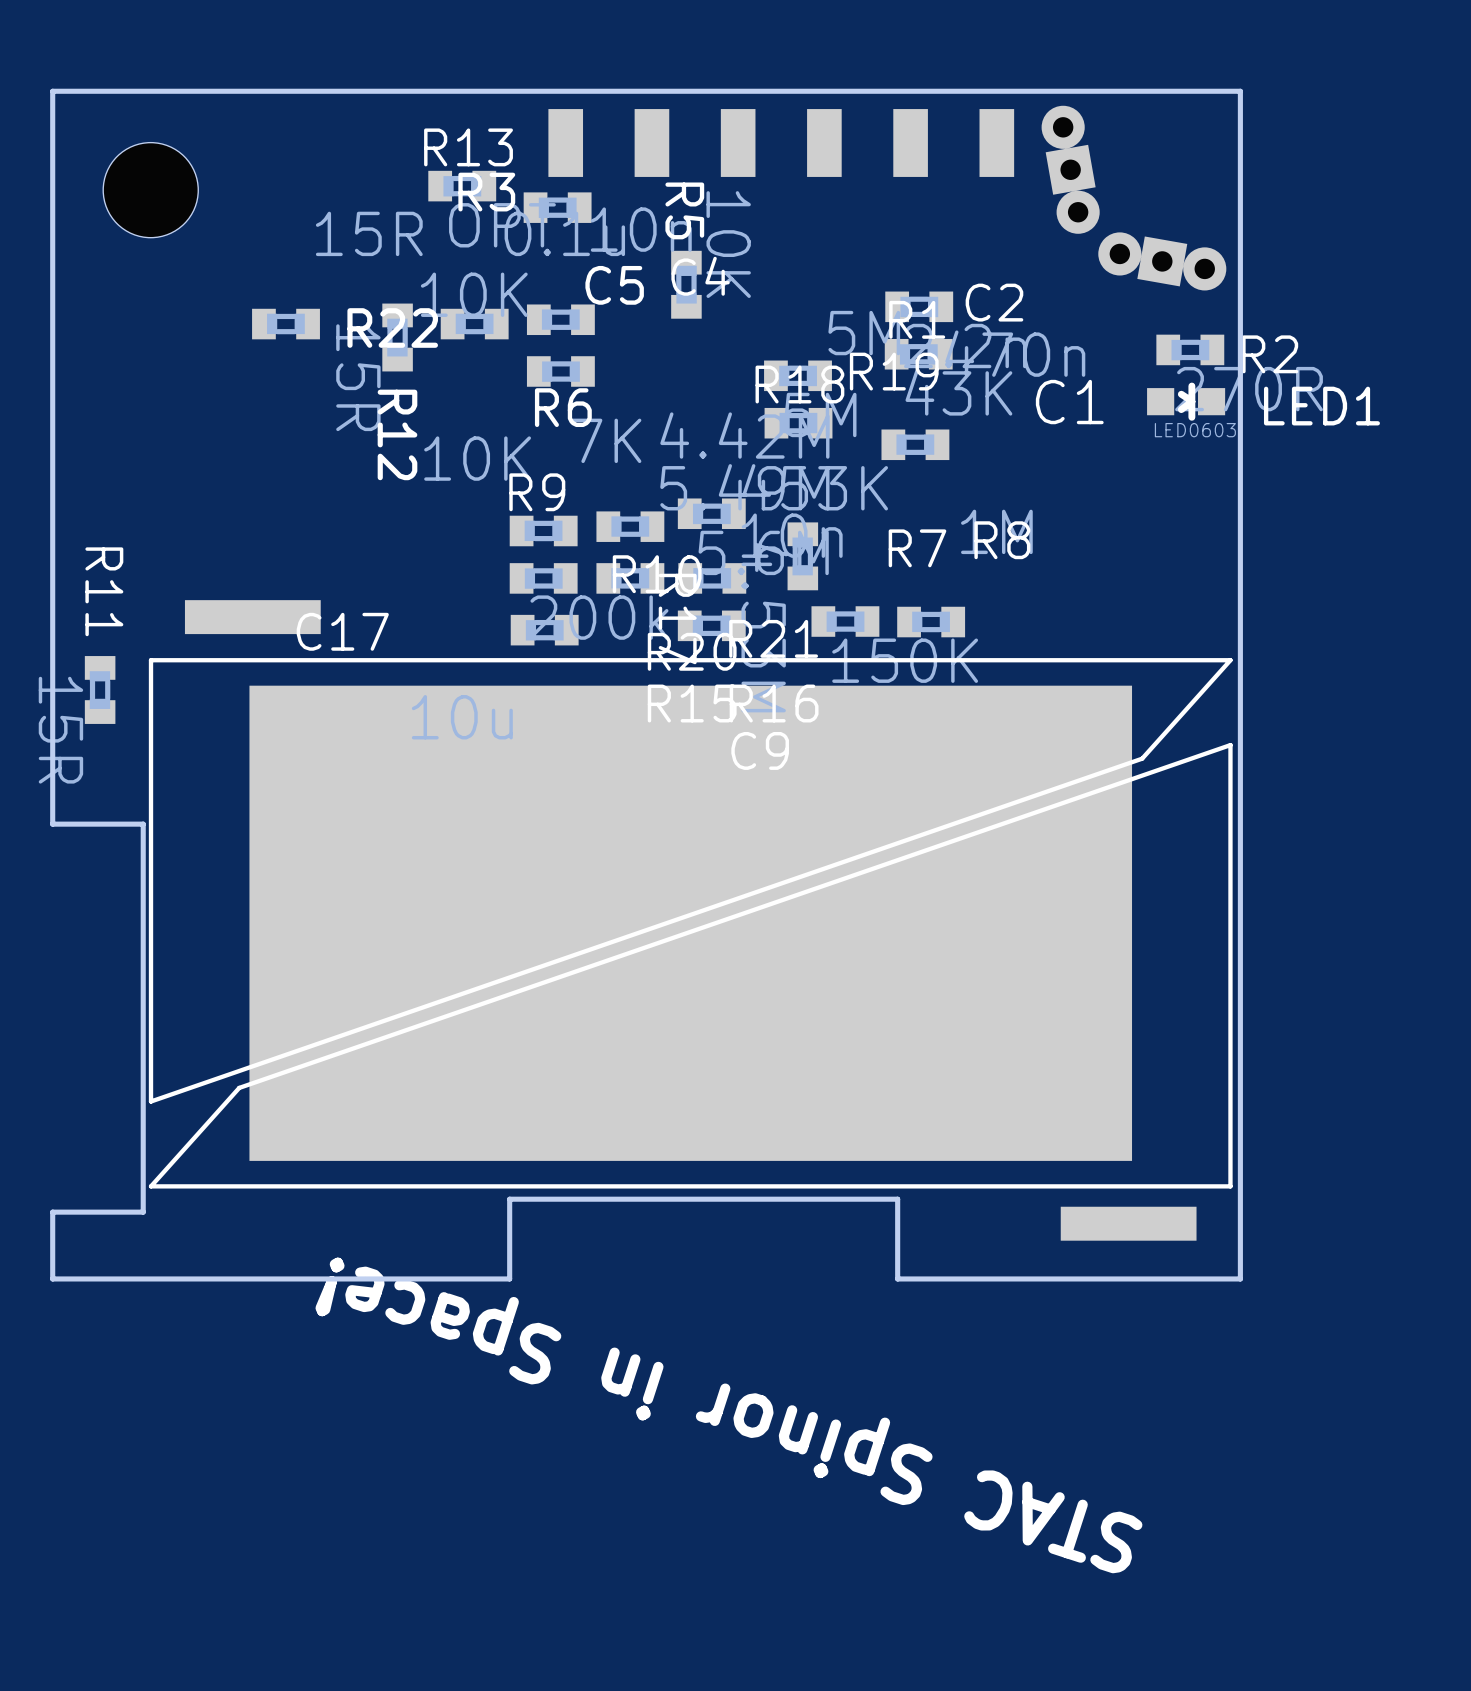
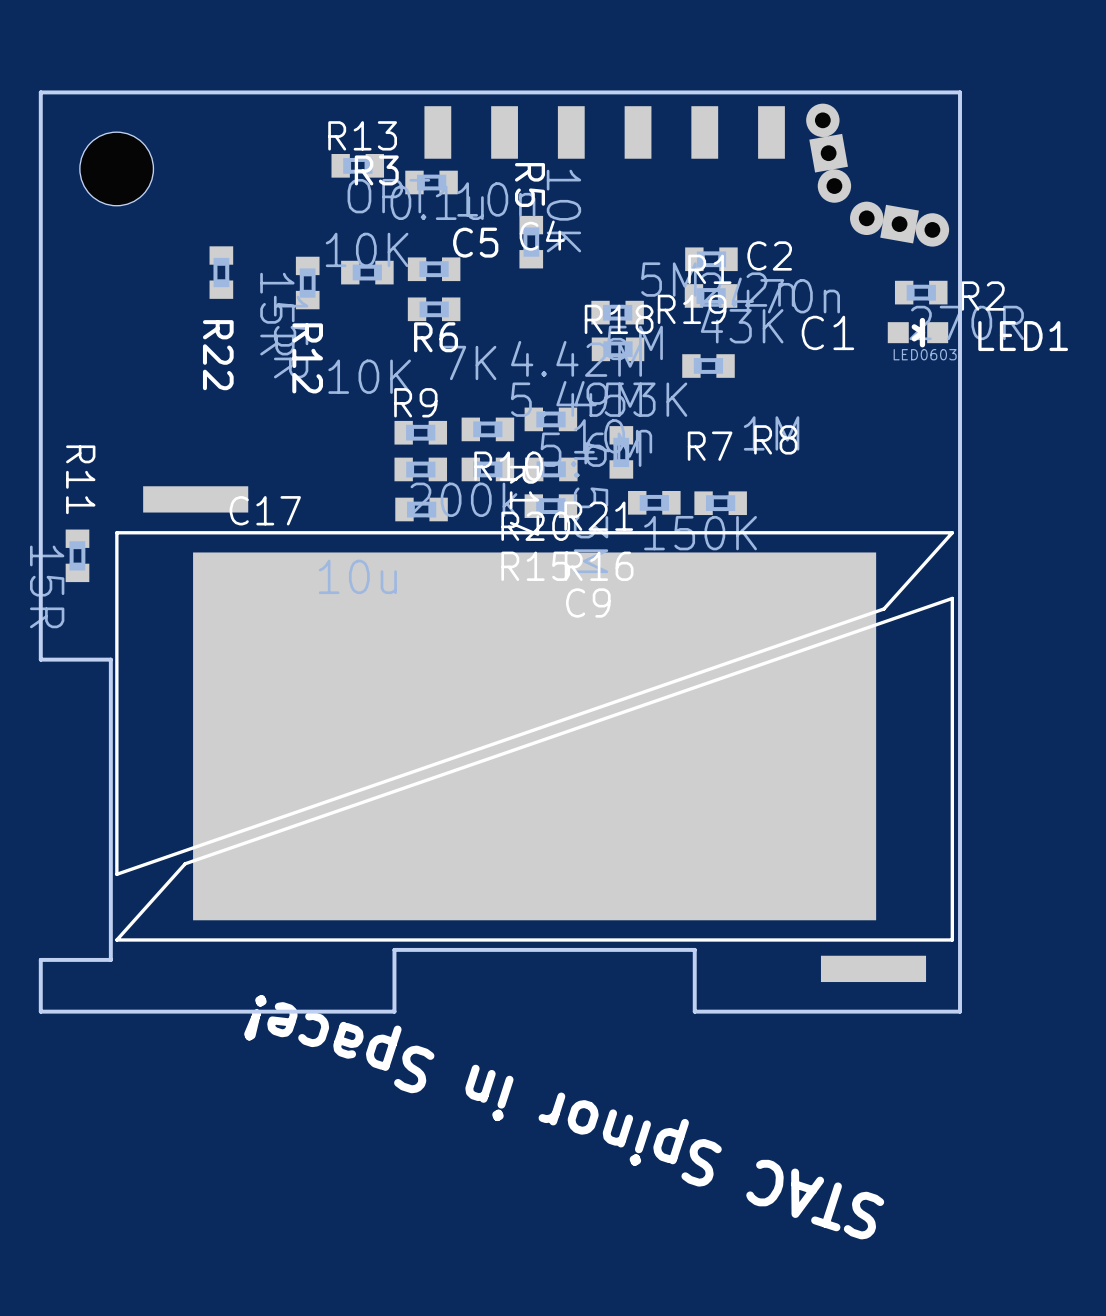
R22 rotation: 0° (286, 324) -> 90° clockwise (221, 272)

